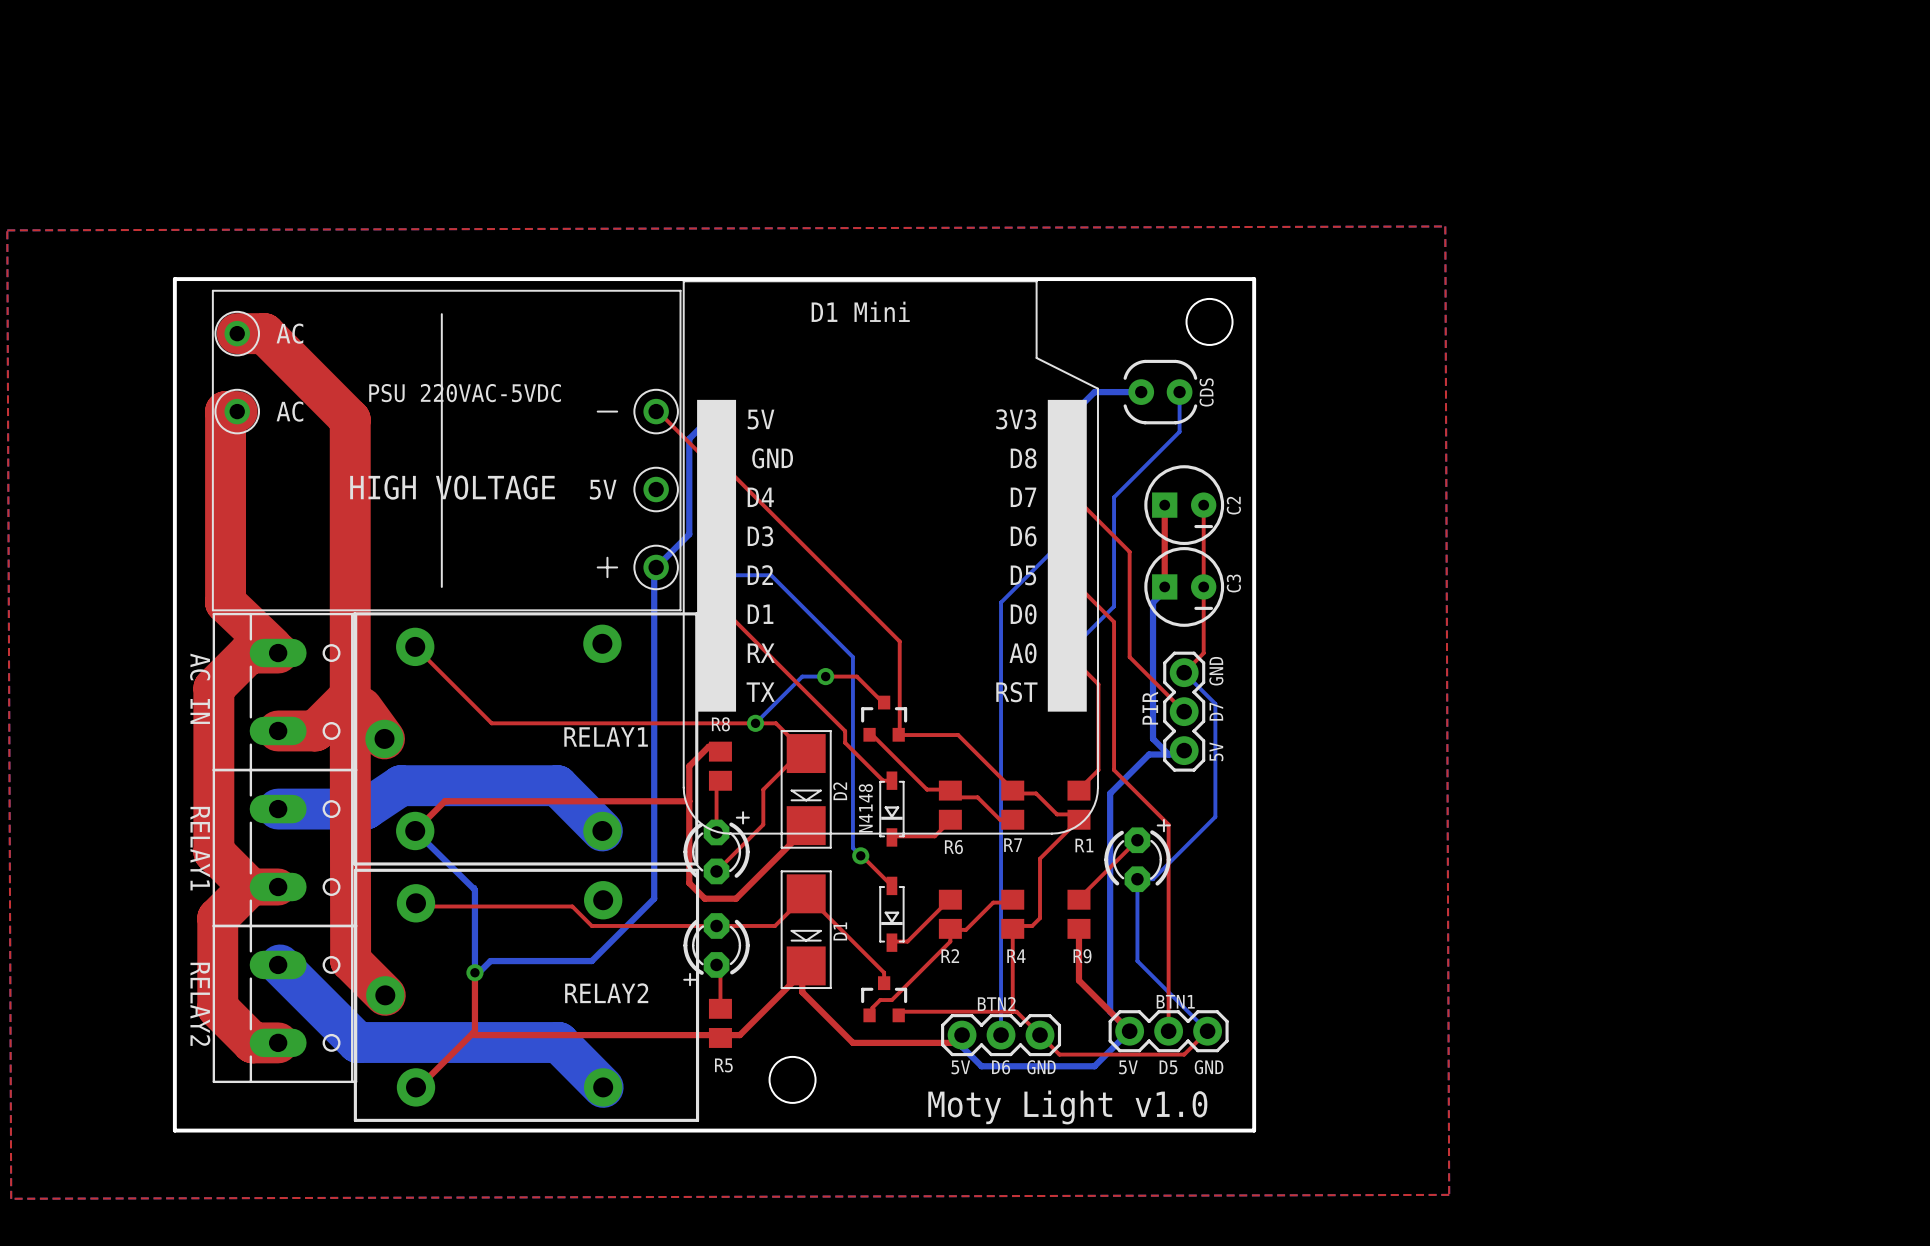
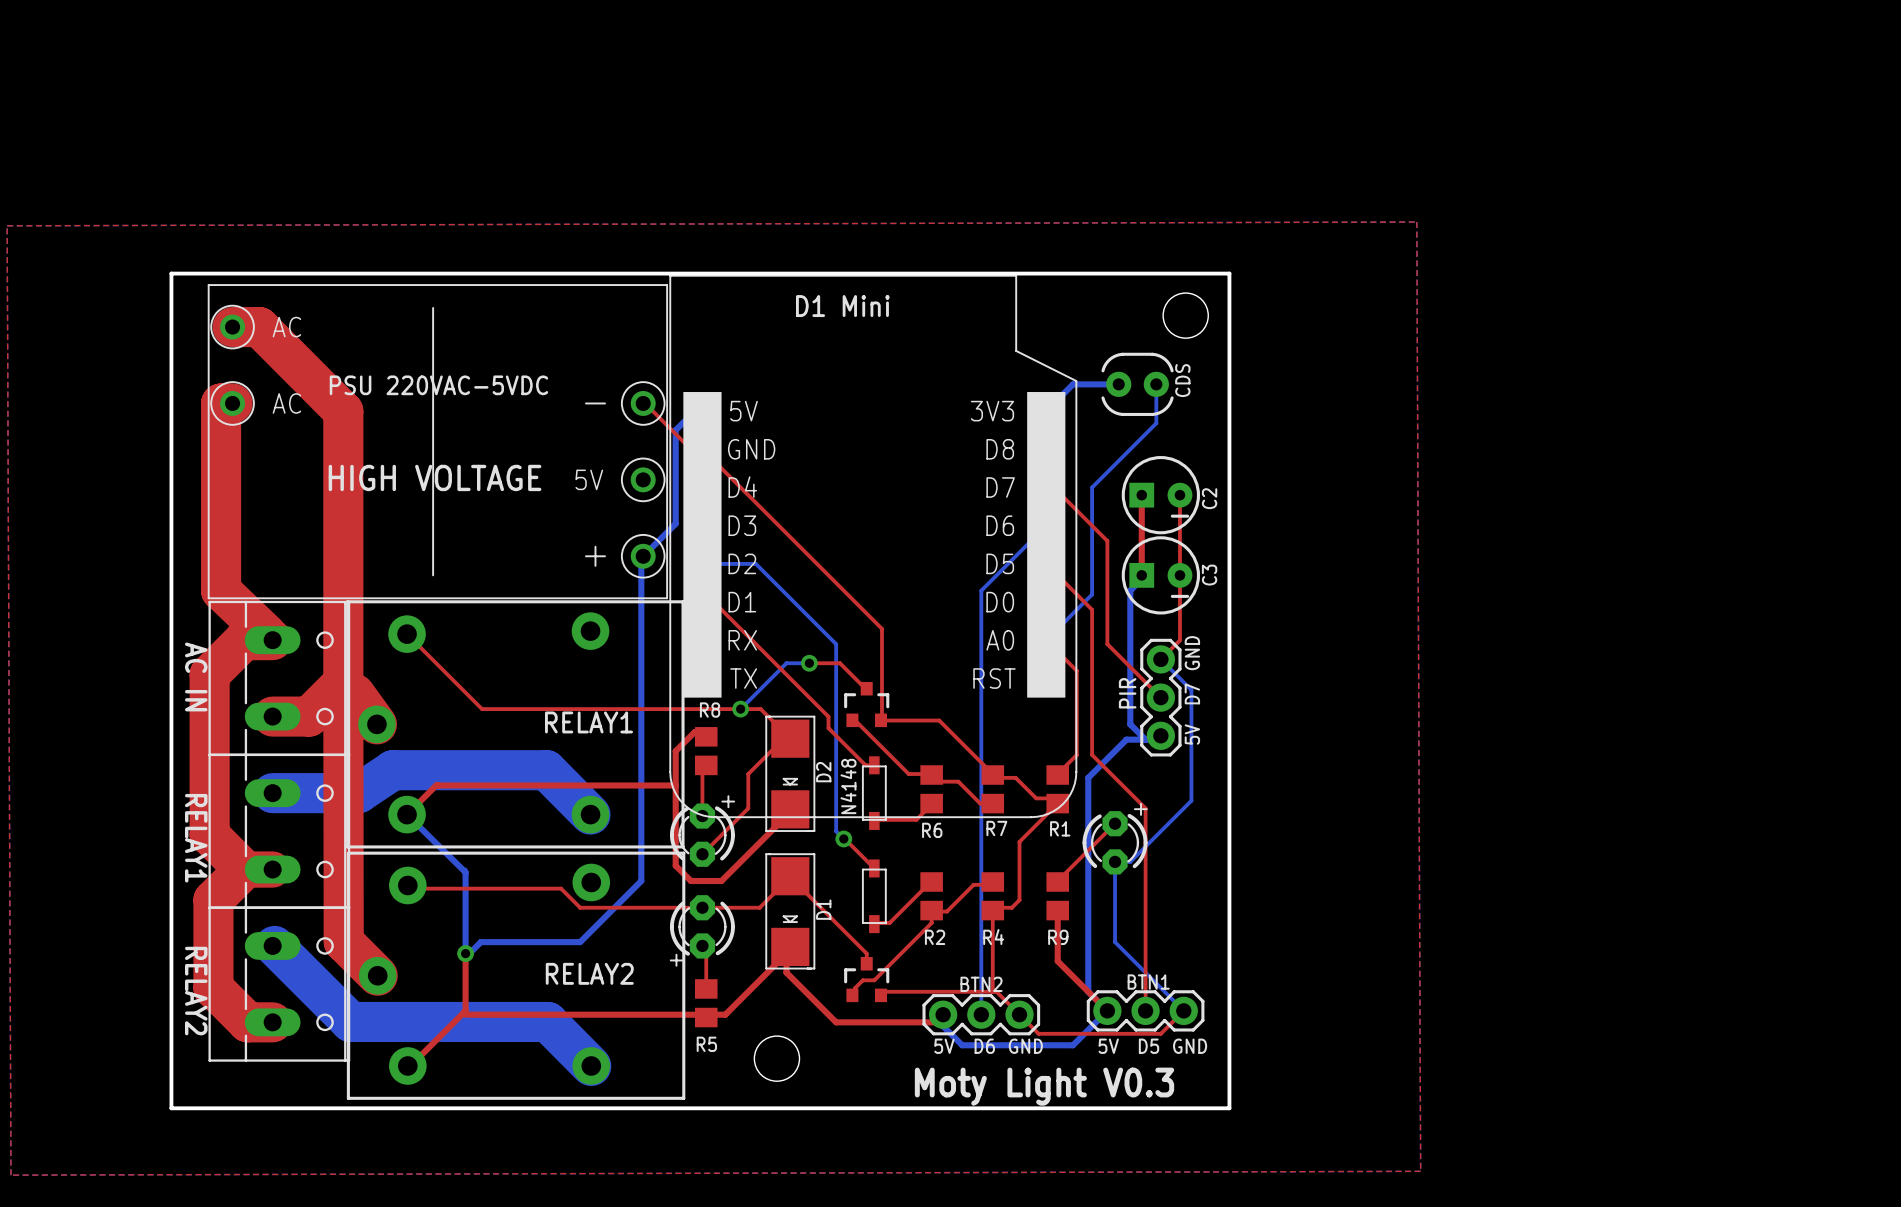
D2 footprint: [780, 730, 832, 849] -> [765, 715, 816, 832]
N4148 footprint: [879, 771, 905, 847] -> [861, 756, 887, 830]
D1 footprint: [780, 870, 832, 989] -> [765, 853, 816, 970]
part footprint: [879, 876, 905, 952] -> [861, 859, 887, 934]
text: Moty Light v1.0 (1067, 1107) -> Moty Light V0.3 (1044, 1086)

